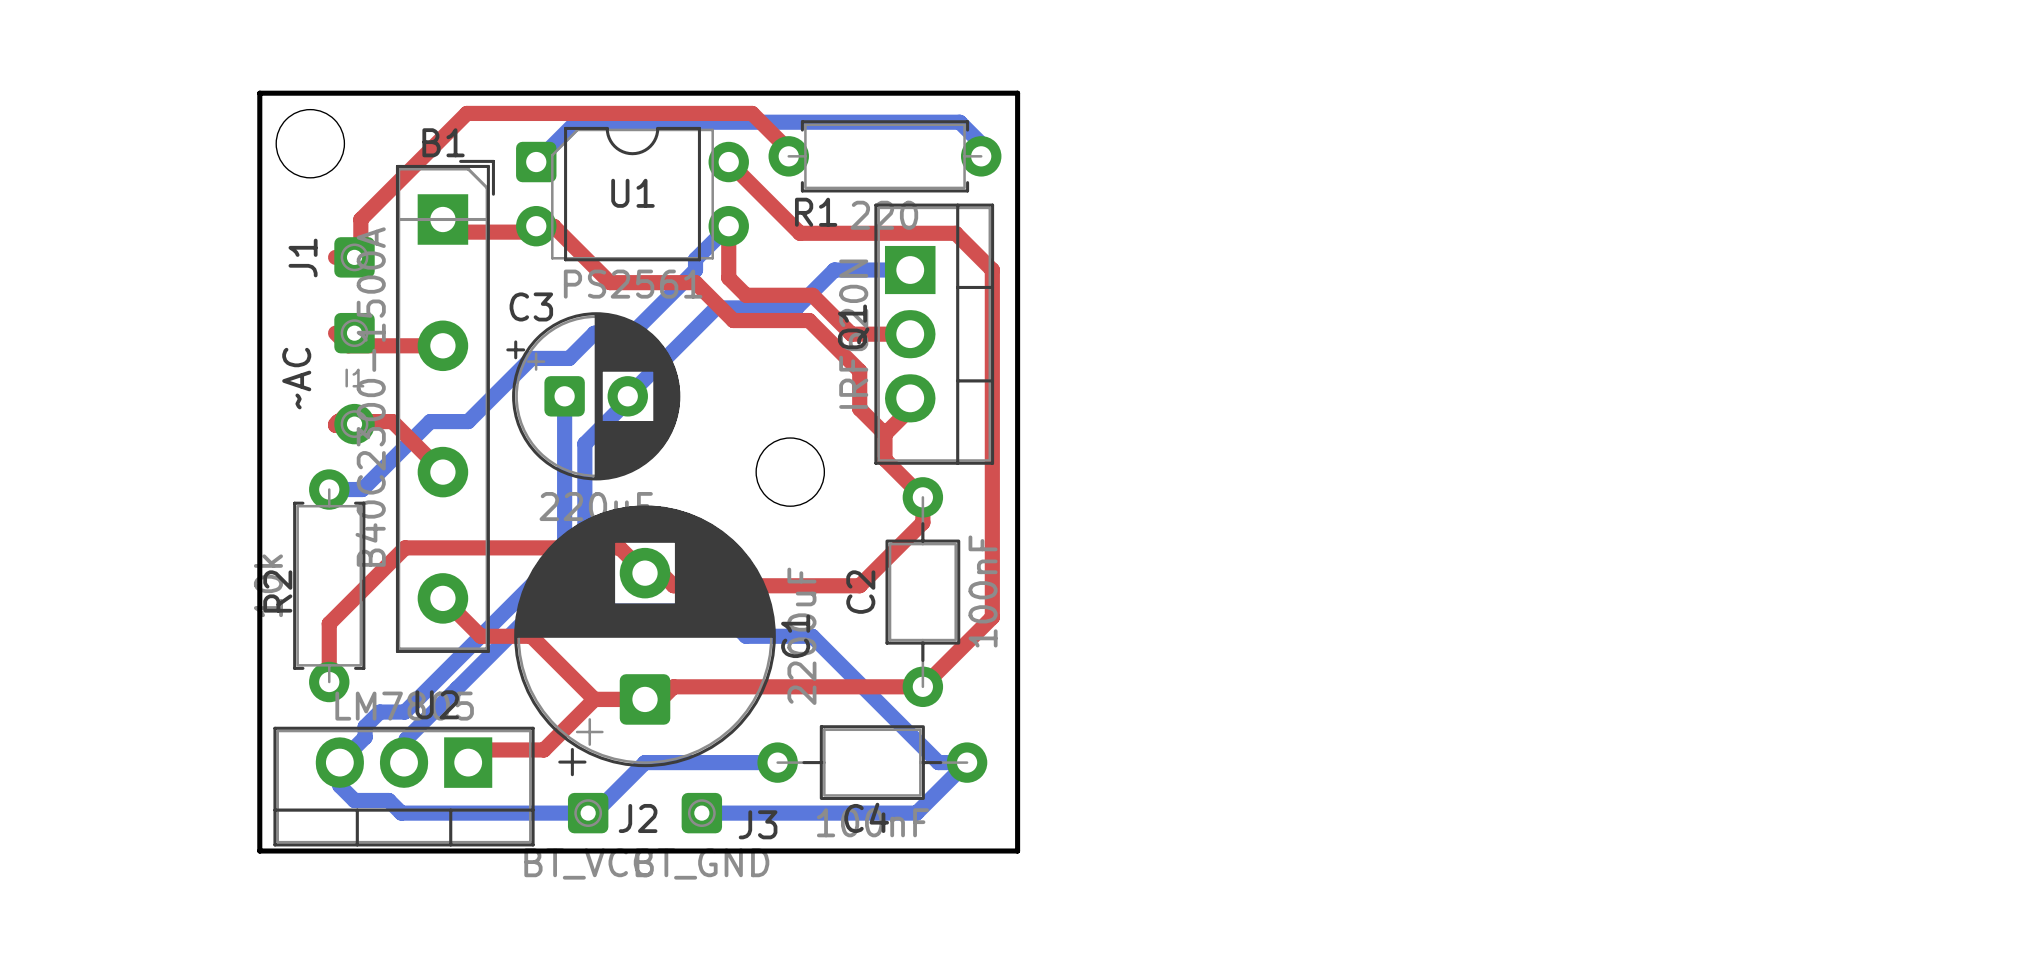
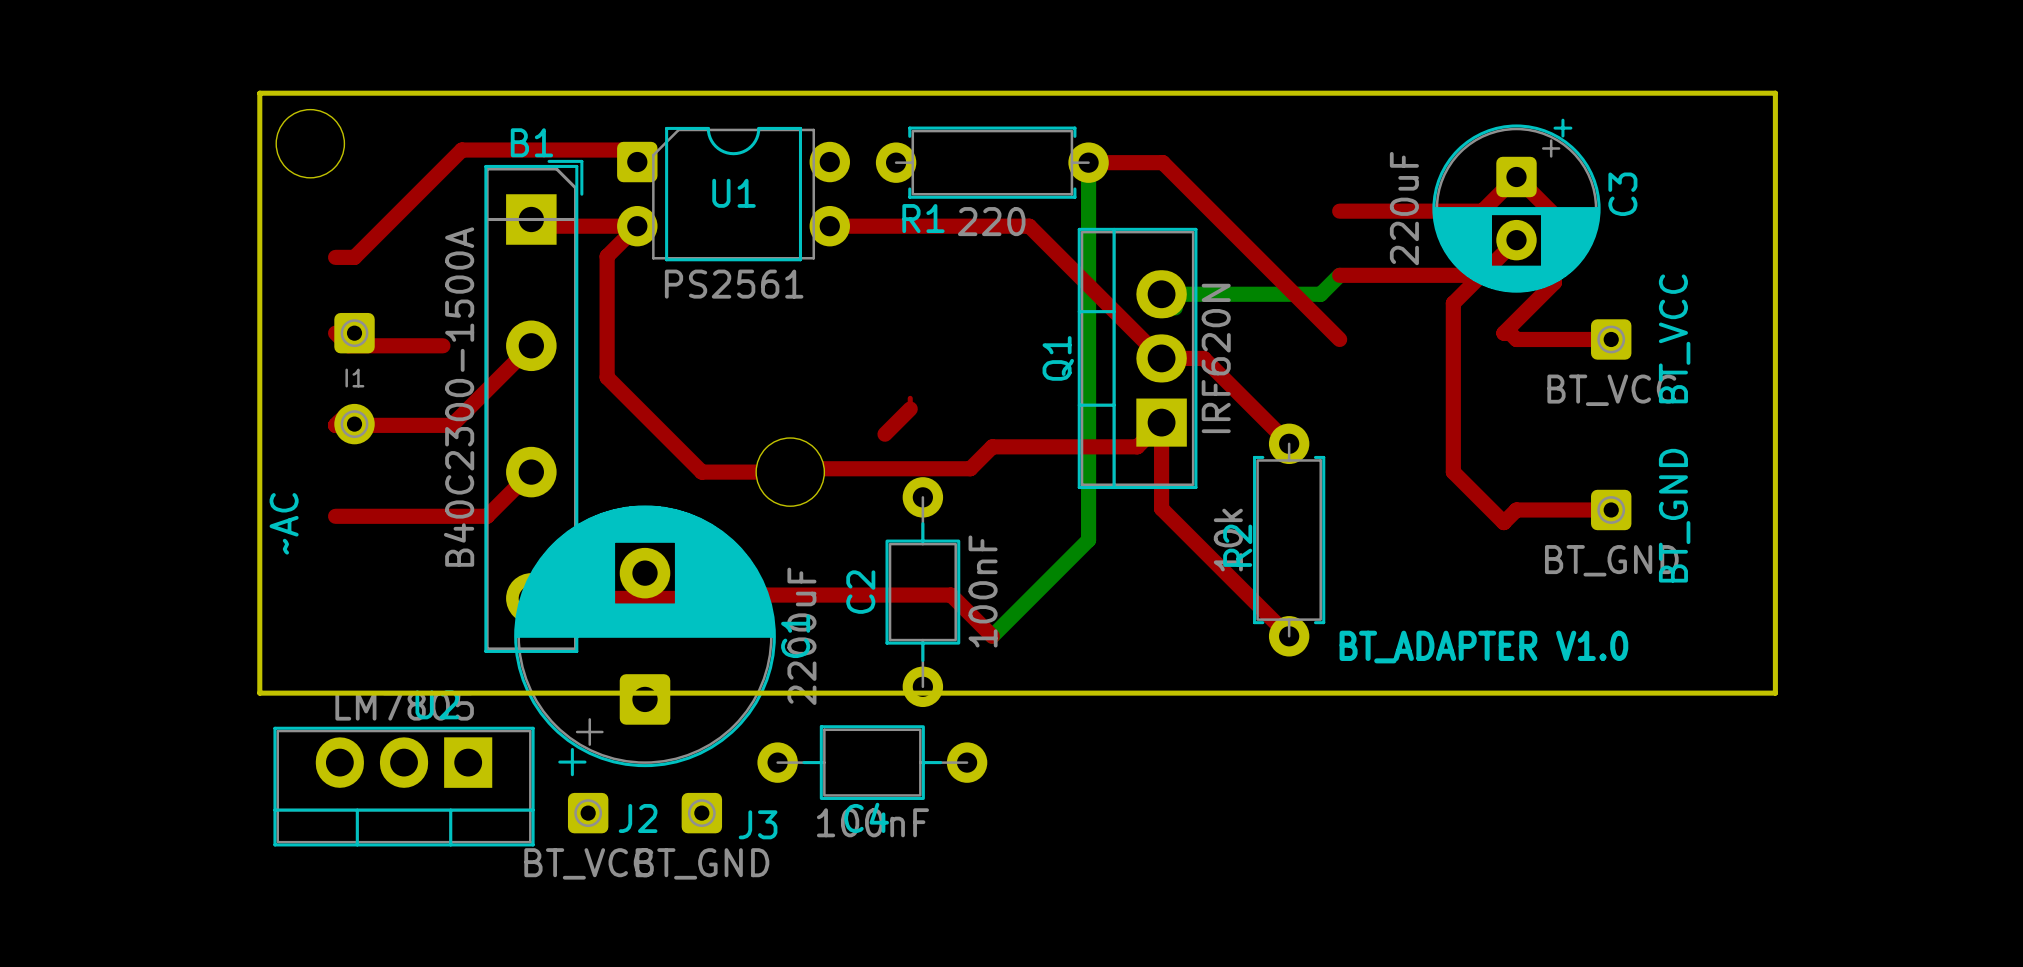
board edge: (1017, 93) (1017, 851) (259, 851) (259, 693) -> (1017, 93) (1775, 93) (1775, 693) (259, 693)
top track: (788, 150) (752, 113) (466, 113) (360, 219) (360, 251) -> (637, 162) (625, 150) (461, 150) (360, 251)
bottom track: (987, 150) (959, 122) (576, 122) (536, 162) -> none
top track: (734, 156) (728, 162) (800, 233) (955, 233) (992, 270) (992, 617) (922, 686) (673, 686) (660, 699) (594, 699) -> none
R1 position: (884, 156) -> (992, 162)
top track: none -> (1088, 162) (1162, 162) (1339, 339)
bottom track: none -> (1088, 162) (1088, 540) (992, 636)
U1 position: (632, 194) -> (733, 194)
top track: none -> (1339, 211) (1482, 211) (1516, 177) (1554, 214) (1554, 282) (1503, 333) (1510, 333) (1516, 339) (1617, 339)
top track: (442, 219) (455, 232) (547, 232) (553, 226) (610, 282) (695, 282) (733, 320) (809, 320) (859, 371) (859, 408) (884, 434) (884, 459) (922, 497) (922, 522) (859, 585) (673, 585) (660, 573) (645, 573) (619, 547) (405, 547) (329, 623) (329, 682) -> none
top track: none -> (538, 226) (637, 226) (607, 256) (607, 377) (701, 472) (761, 472) (764, 468) (970, 468) (992, 446) (1137, 446) (1161, 422) (1161, 508) (1289, 636)
top track: (728, 226) (728, 277) (746, 295) (812, 295) (851, 334) (910, 334) -> none
bottom track: (728, 226) (695, 259) (695, 270) (632, 333) (594, 333) (569, 358) (531, 358) (468, 421) (430, 421) (362, 489) (329, 489) -> none
top track: none -> (829, 226) (1029, 226) (1161, 358) (1203, 358) (1289, 443)
top track: none -> (1516, 240) (1453, 303) (1453, 472) (1503, 522) (1516, 509) (1611, 509)
J1: (354, 257) -> none
bottom track: (910, 270) (834, 270) (796, 307) (716, 307) (627, 396) (627, 400) (584, 443) (584, 560) (406, 739) (406, 749) -> none
top track: none -> (1339, 275) (1481, 275)
bottom track: none -> (1339, 275) (1320, 294) (1161, 294) (1175, 307)
C3 name position: C3 (531, 306) -> C3 (1622, 194)
top track: none -> (518, 333) (531, 345) (451, 425) (335, 425)
Q1 rotation: 0° (934, 334) -> 180° (1137, 358)
Q1 position: (934, 334) -> (1137, 358)
BT_VCC: none -> BT_VCC (1611, 339)
text position: ~AC (296, 378) -> ~AC (284, 523)
bottom track: (564, 396) (564, 552) (404, 712) (379, 712) (365, 726) (365, 737) (339, 762) (339, 785) (354, 800) (388, 800) (401, 813) (594, 813) (645, 762) (777, 762) -> none
C3 rotation: 0° (593, 396) -> 90° clockwise (1516, 205)
C3 position: (593, 396) -> (1516, 205)
B1 position: (445, 406) -> (533, 406)
top track: (335, 424) (338, 421) (392, 421) (442, 472) -> none
top track: none -> (531, 472) (487, 516) (335, 516)
BT_GND: none -> BT_GND (1611, 509)
R2 position: (329, 585) -> (1289, 540)
top track: (442, 598) (480, 636) (531, 636) (594, 699) -> none
top track: none -> (531, 598) (761, 598) (764, 595) (951, 595) (992, 636)
bottom track: (545, 599) (556, 611) (720, 611) (746, 636) (812, 636) (938, 762) (967, 762) (916, 813) (695, 813) -> none
text: none -> BT_ADAPTER V1.0 (1483, 647)
top track: (594, 699) (543, 749) (470, 749) -> none

